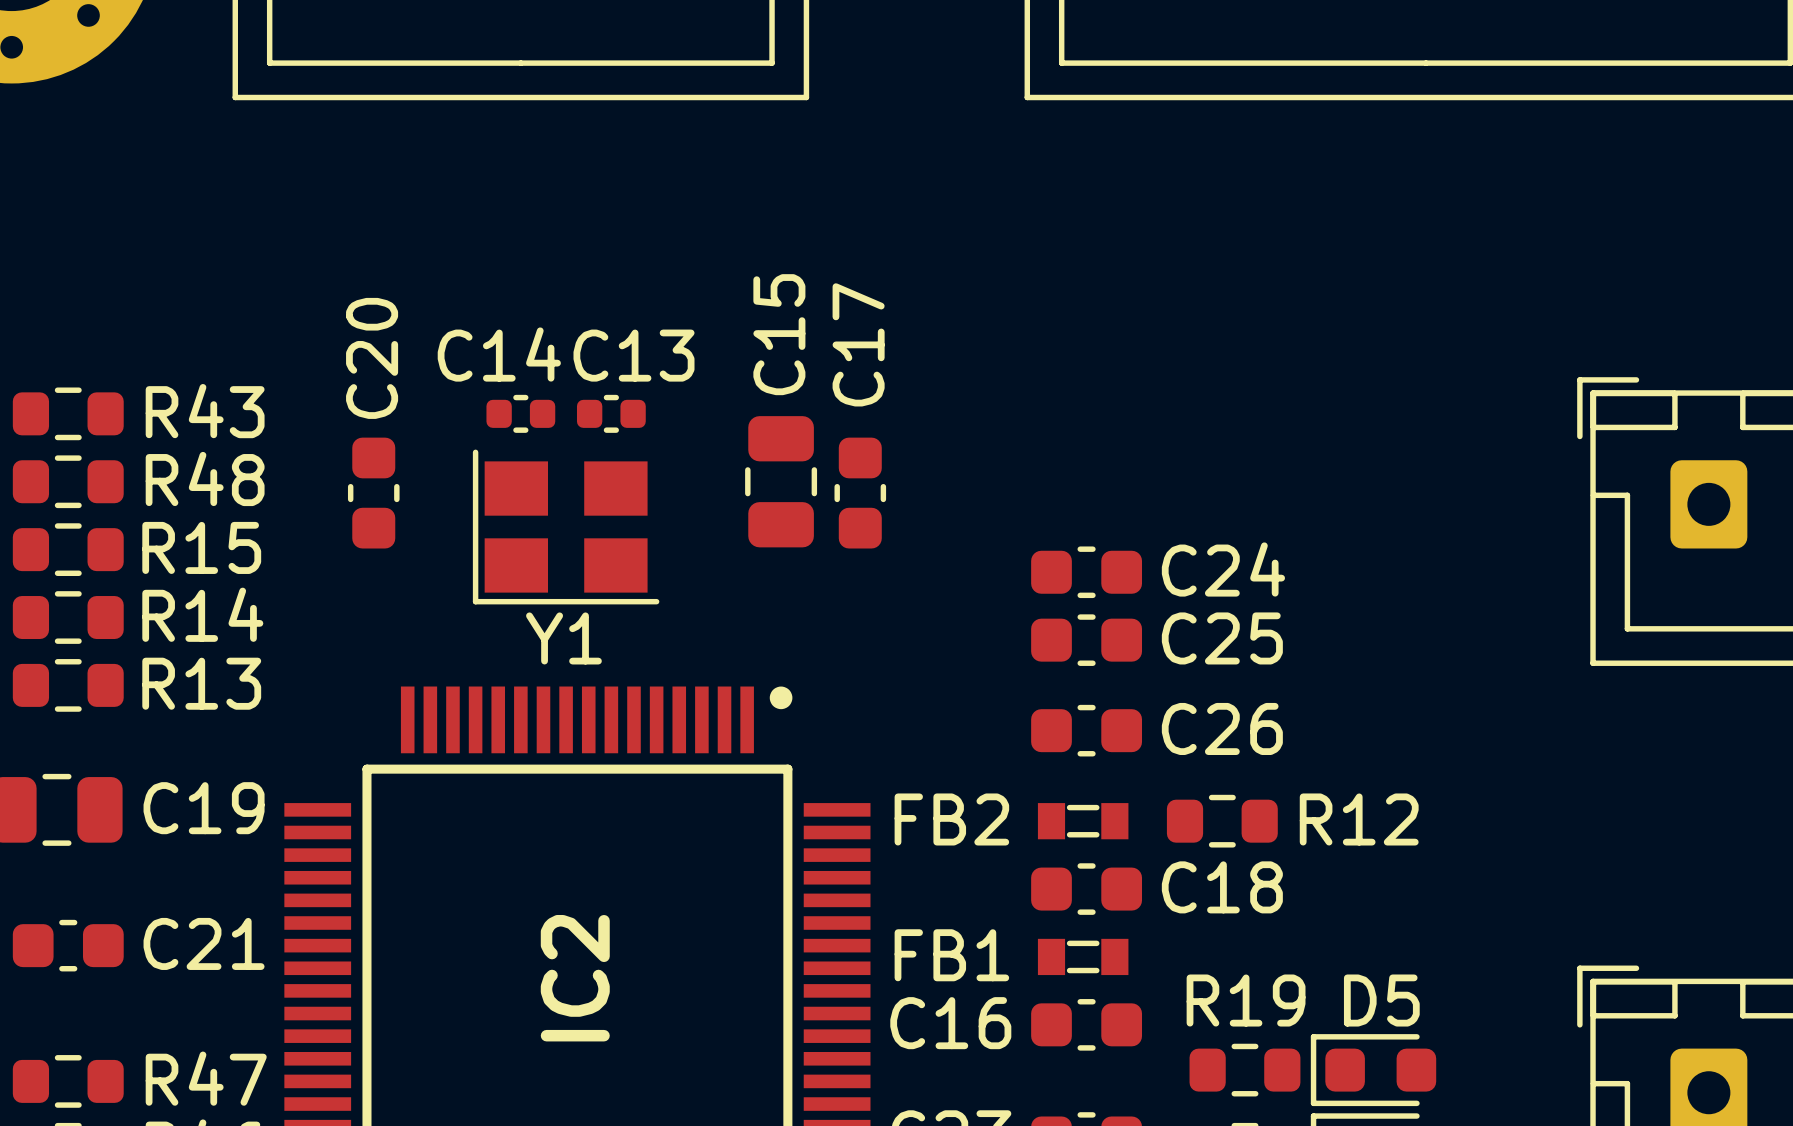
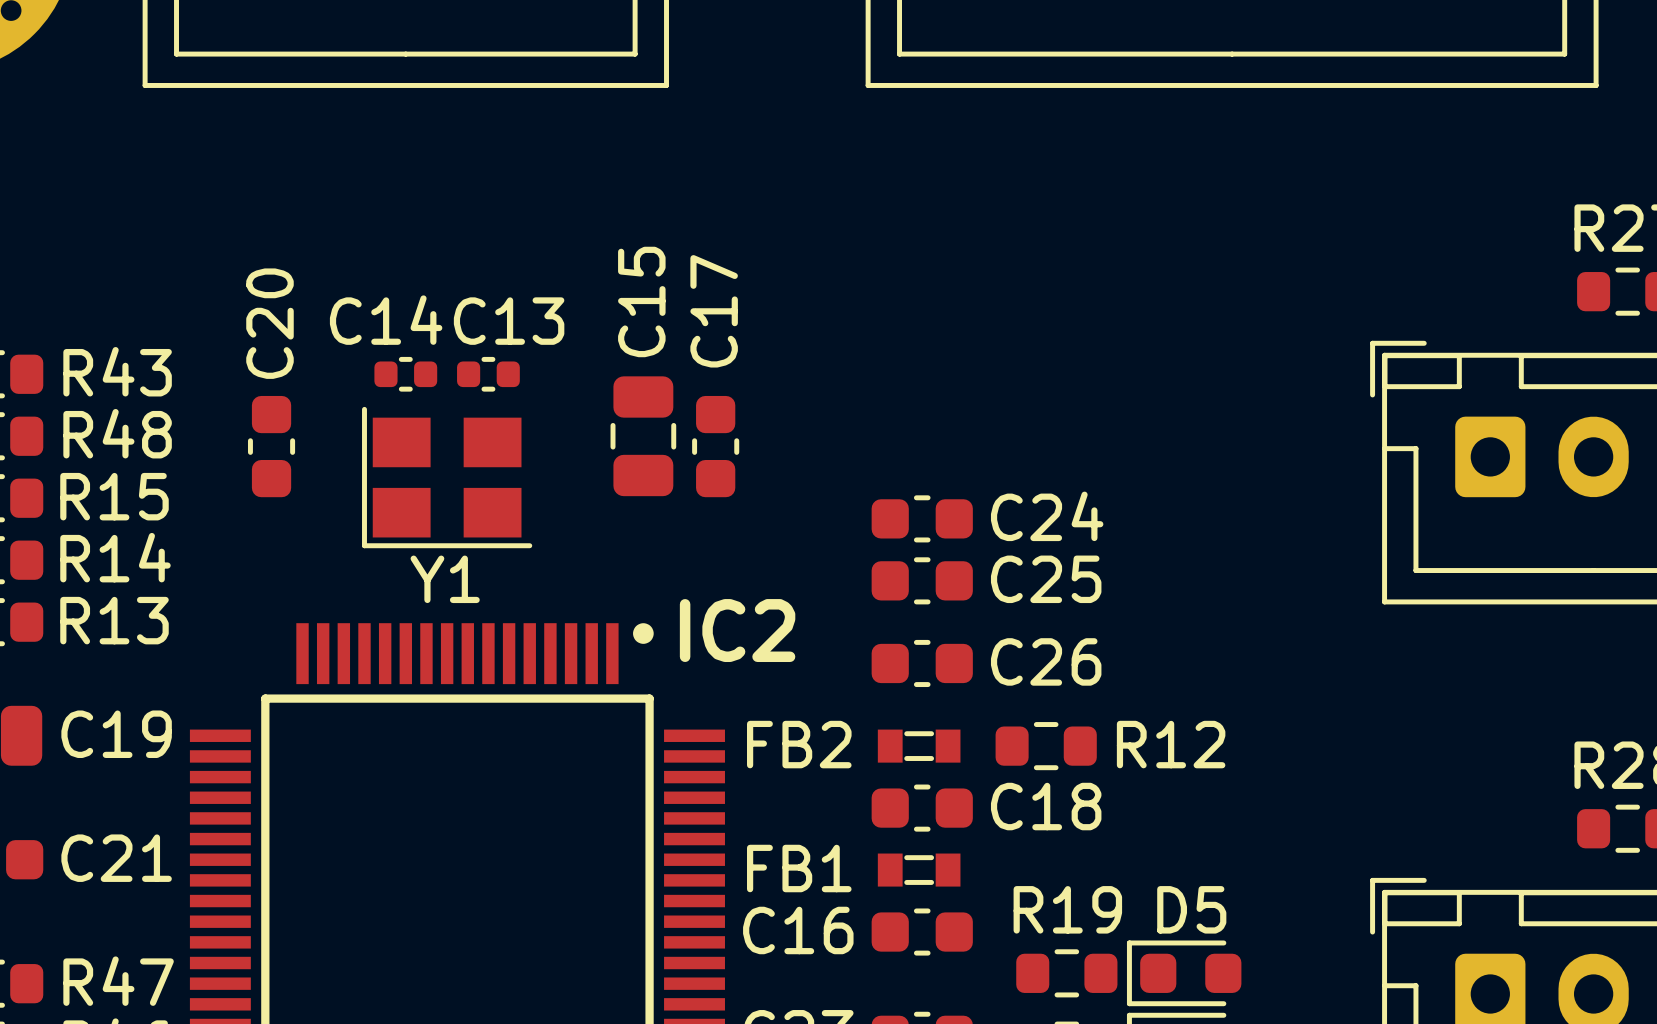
IC2 name rotation: 0° (575, 978) -> 90° clockwise (737, 630)
IC2 name position: IC2 (575, 978) -> IC2 (737, 630)

